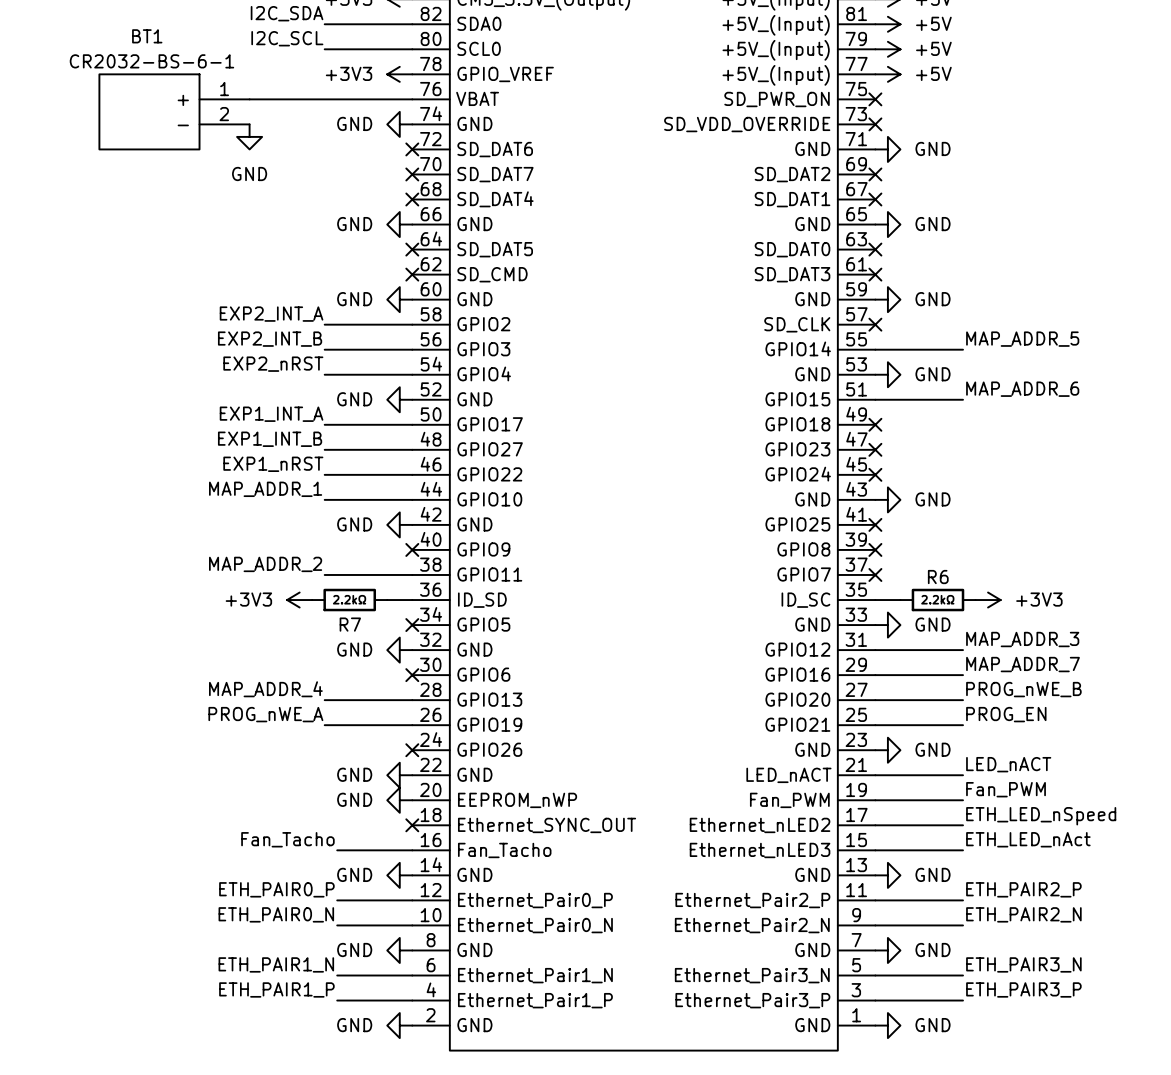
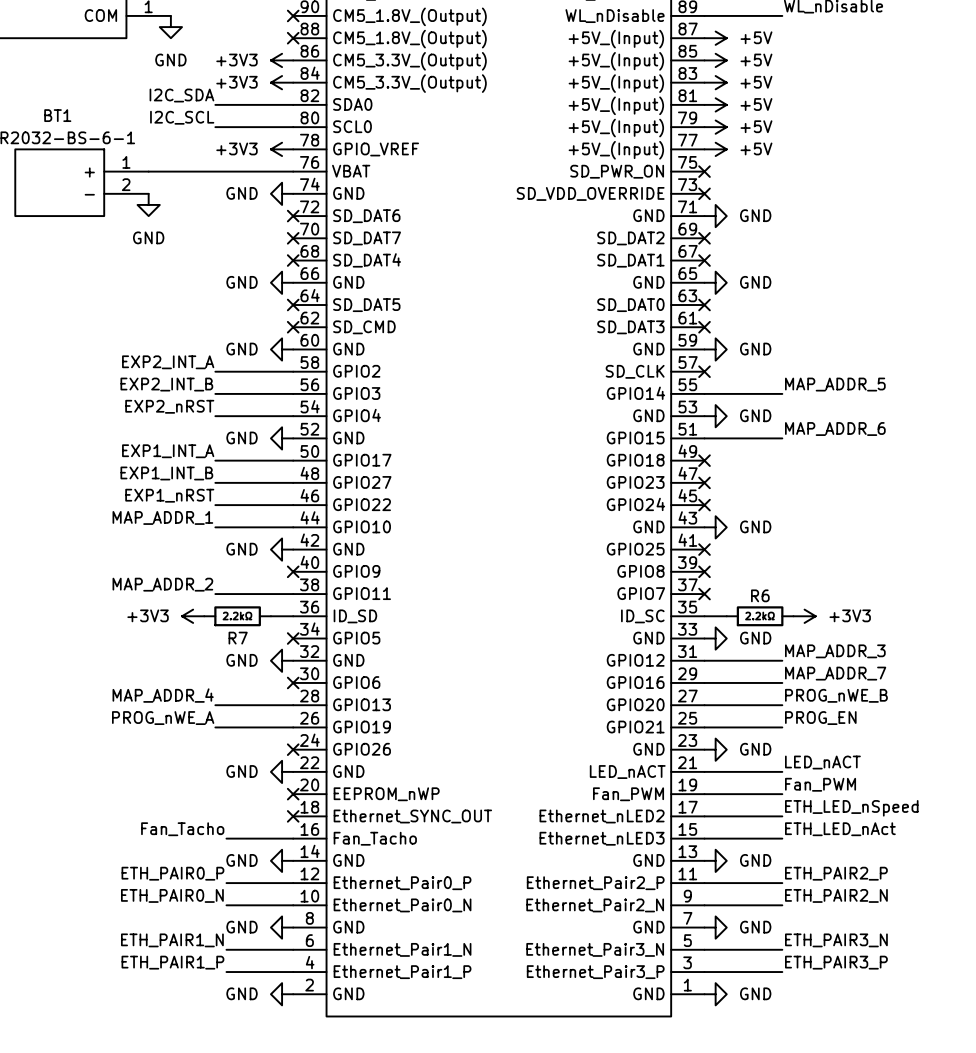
power symbol: GND (399, 800) -> none
no-connect mark: none -> (293, 794)

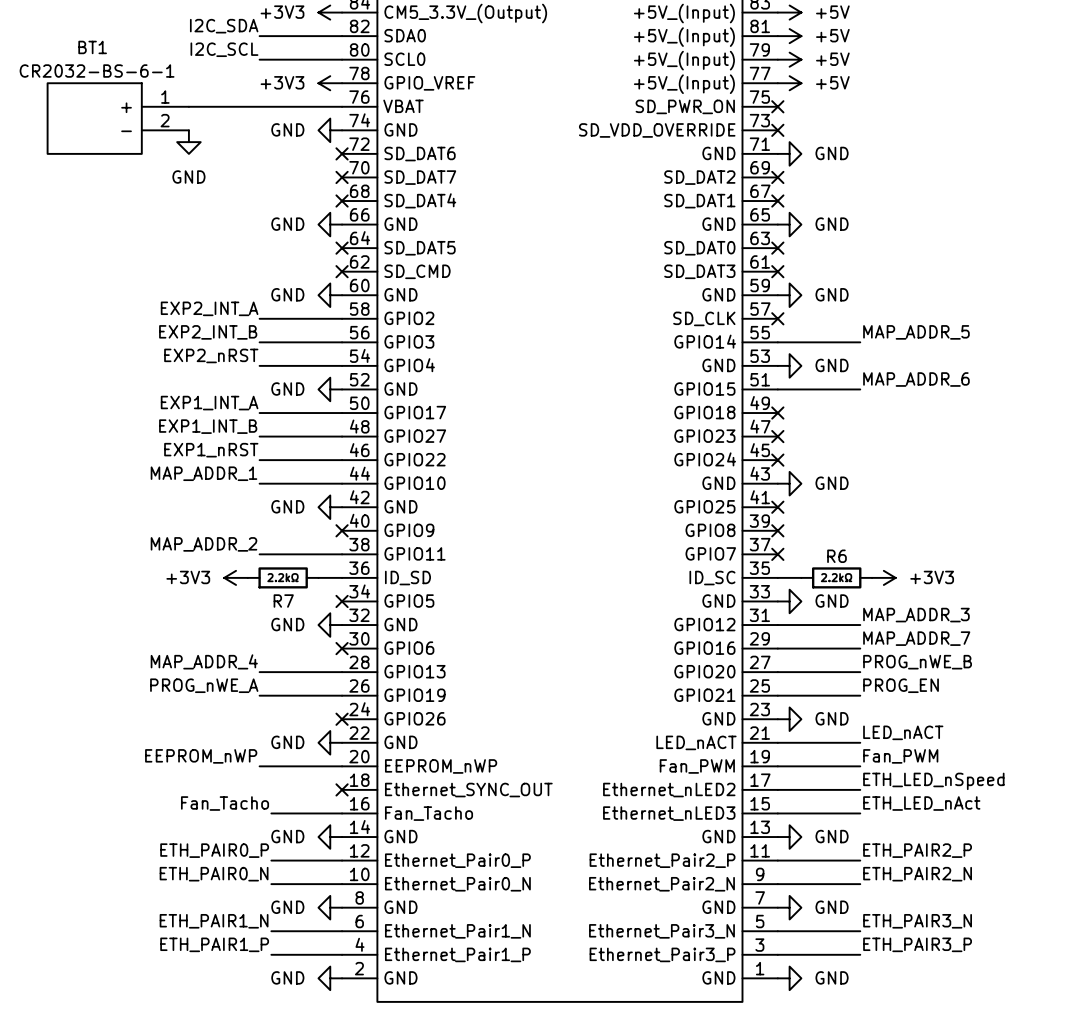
label: none -> EEPROM_nWP (201, 756)
wire: none -> (259, 766) (342, 766)
no-connect mark: (293, 794) -> none

